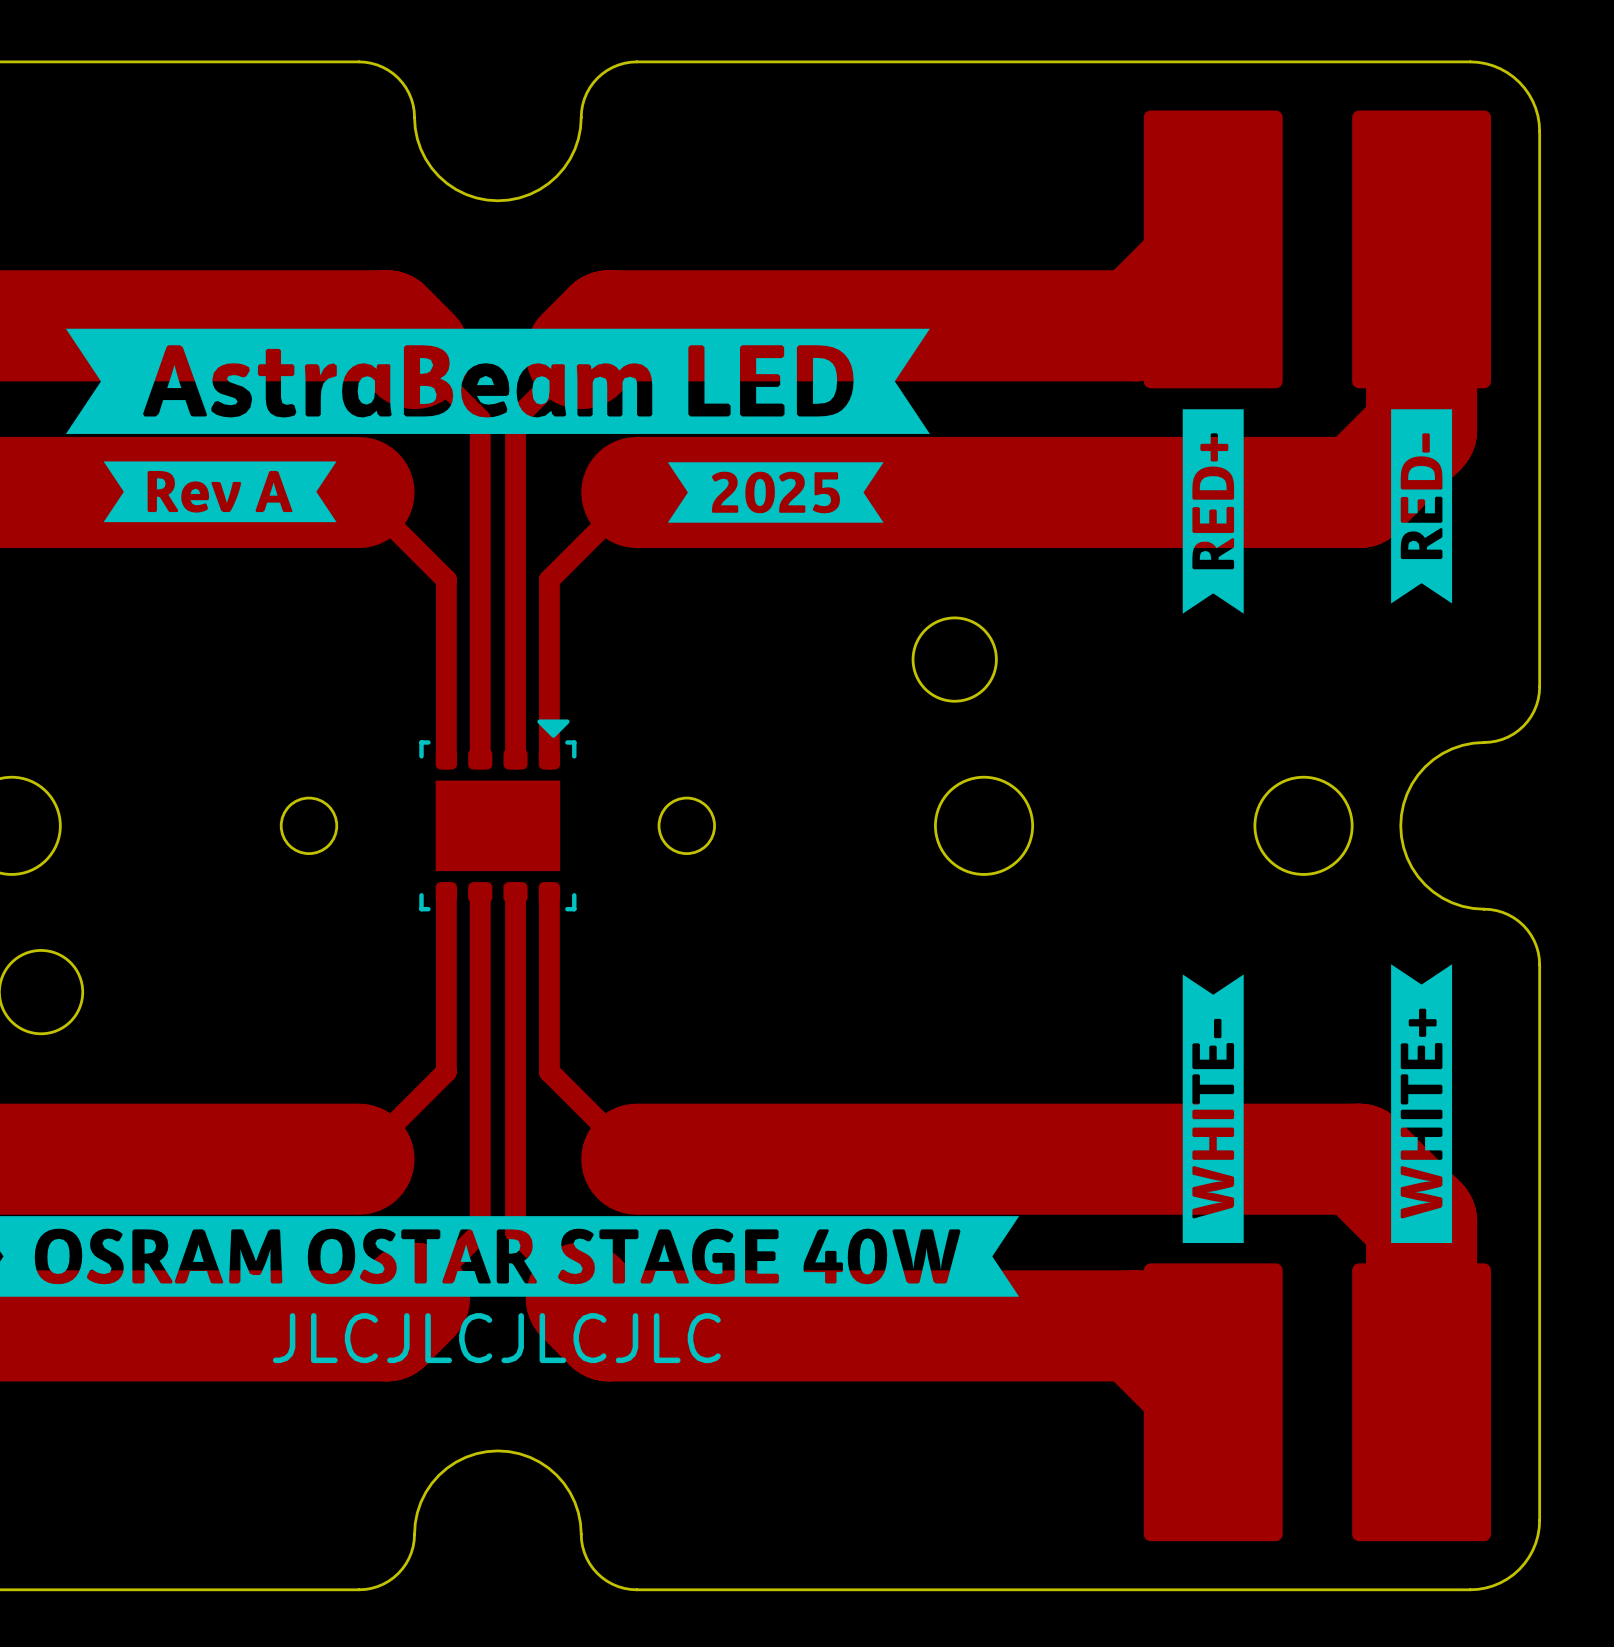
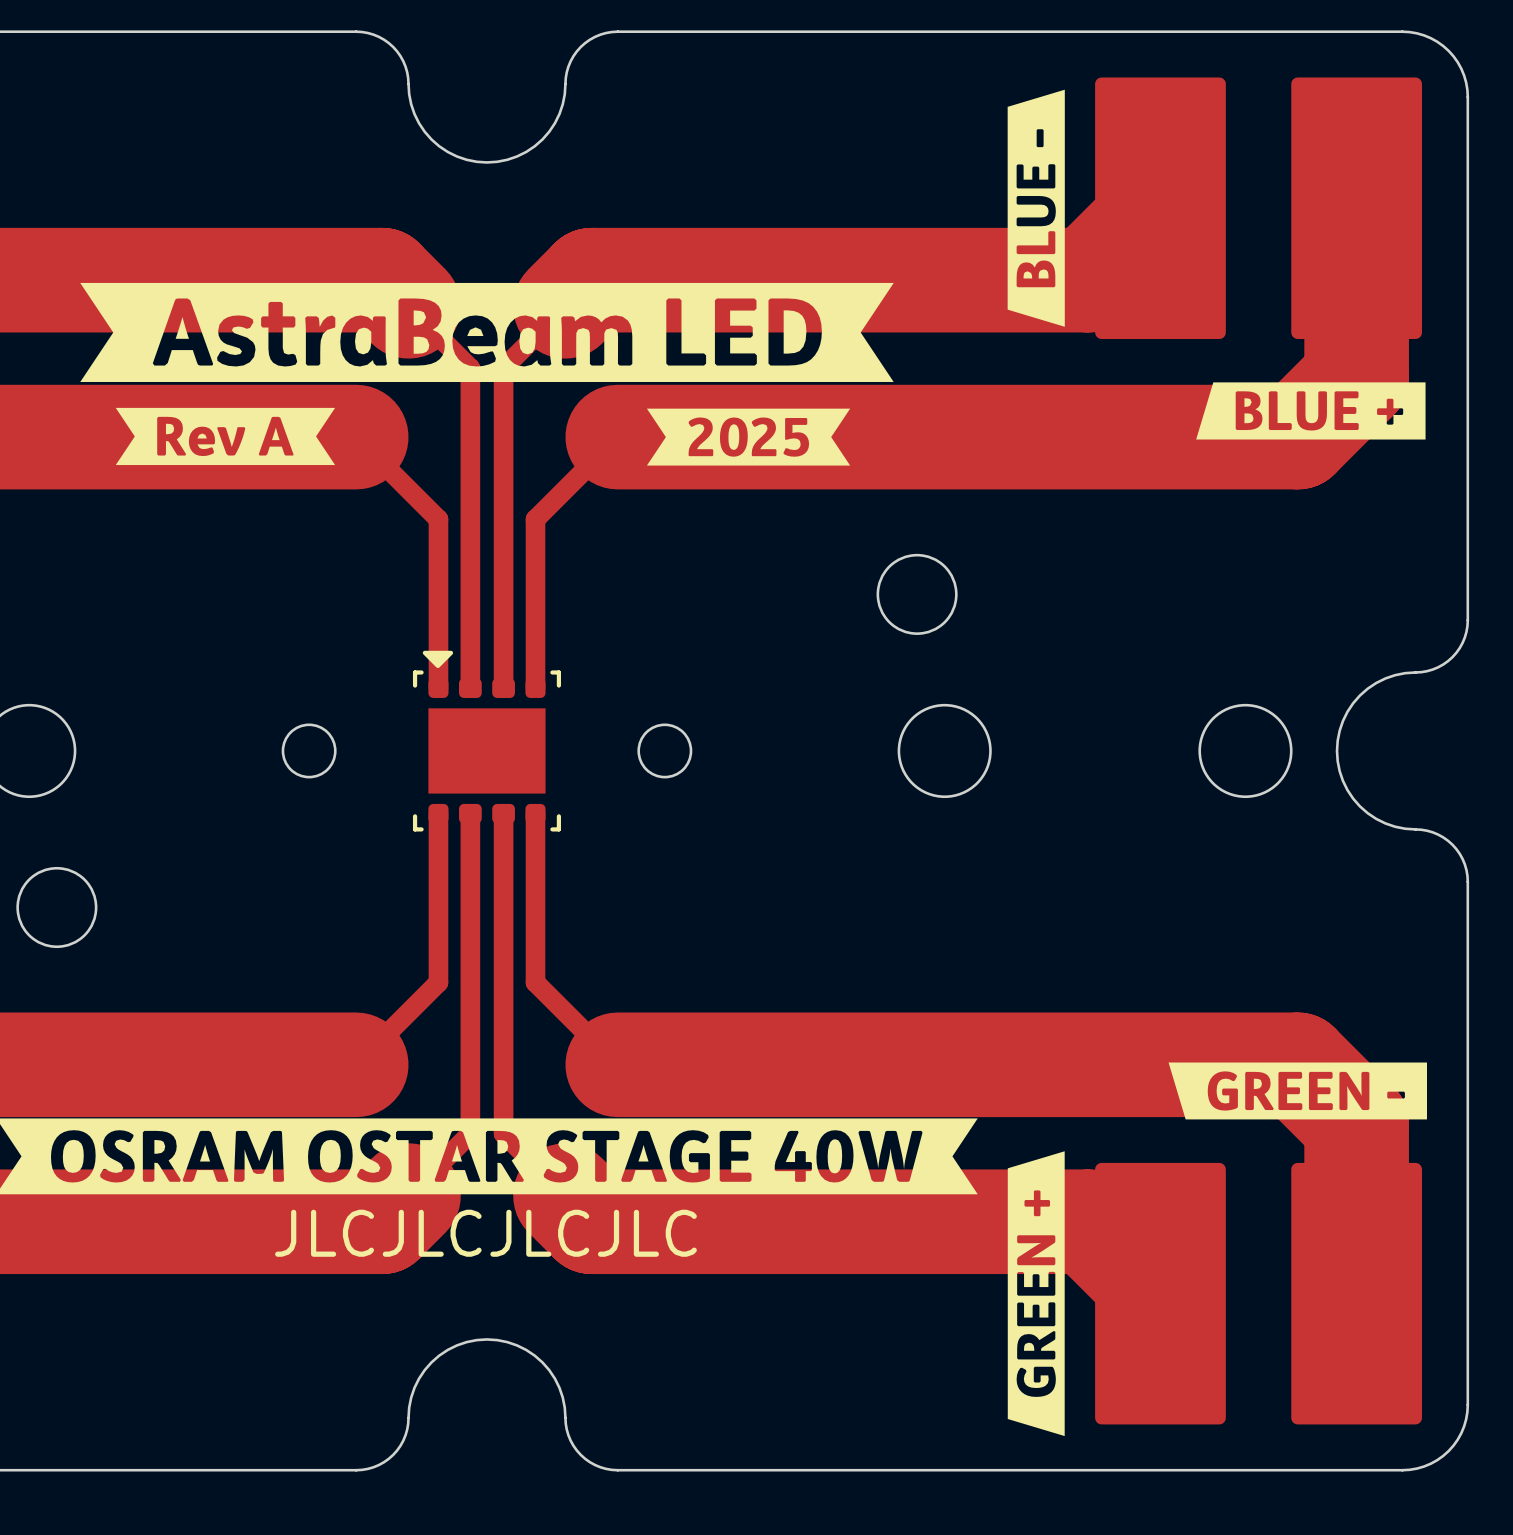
drawing: none -> [1007, 89, 1065, 327]
drawing: [1182, 409, 1244, 614] -> none
drawing: [1391, 409, 1453, 604] -> none
drawing: none -> [1196, 382, 1426, 440]
part footprint: [419, 719, 577, 912] -> [412, 650, 562, 832]
drawing: [1391, 964, 1453, 1244] -> none
drawing: [1182, 974, 1244, 1244] -> none
drawing: none -> [1168, 1062, 1427, 1120]
drawing: none -> [1007, 1151, 1065, 1437]

